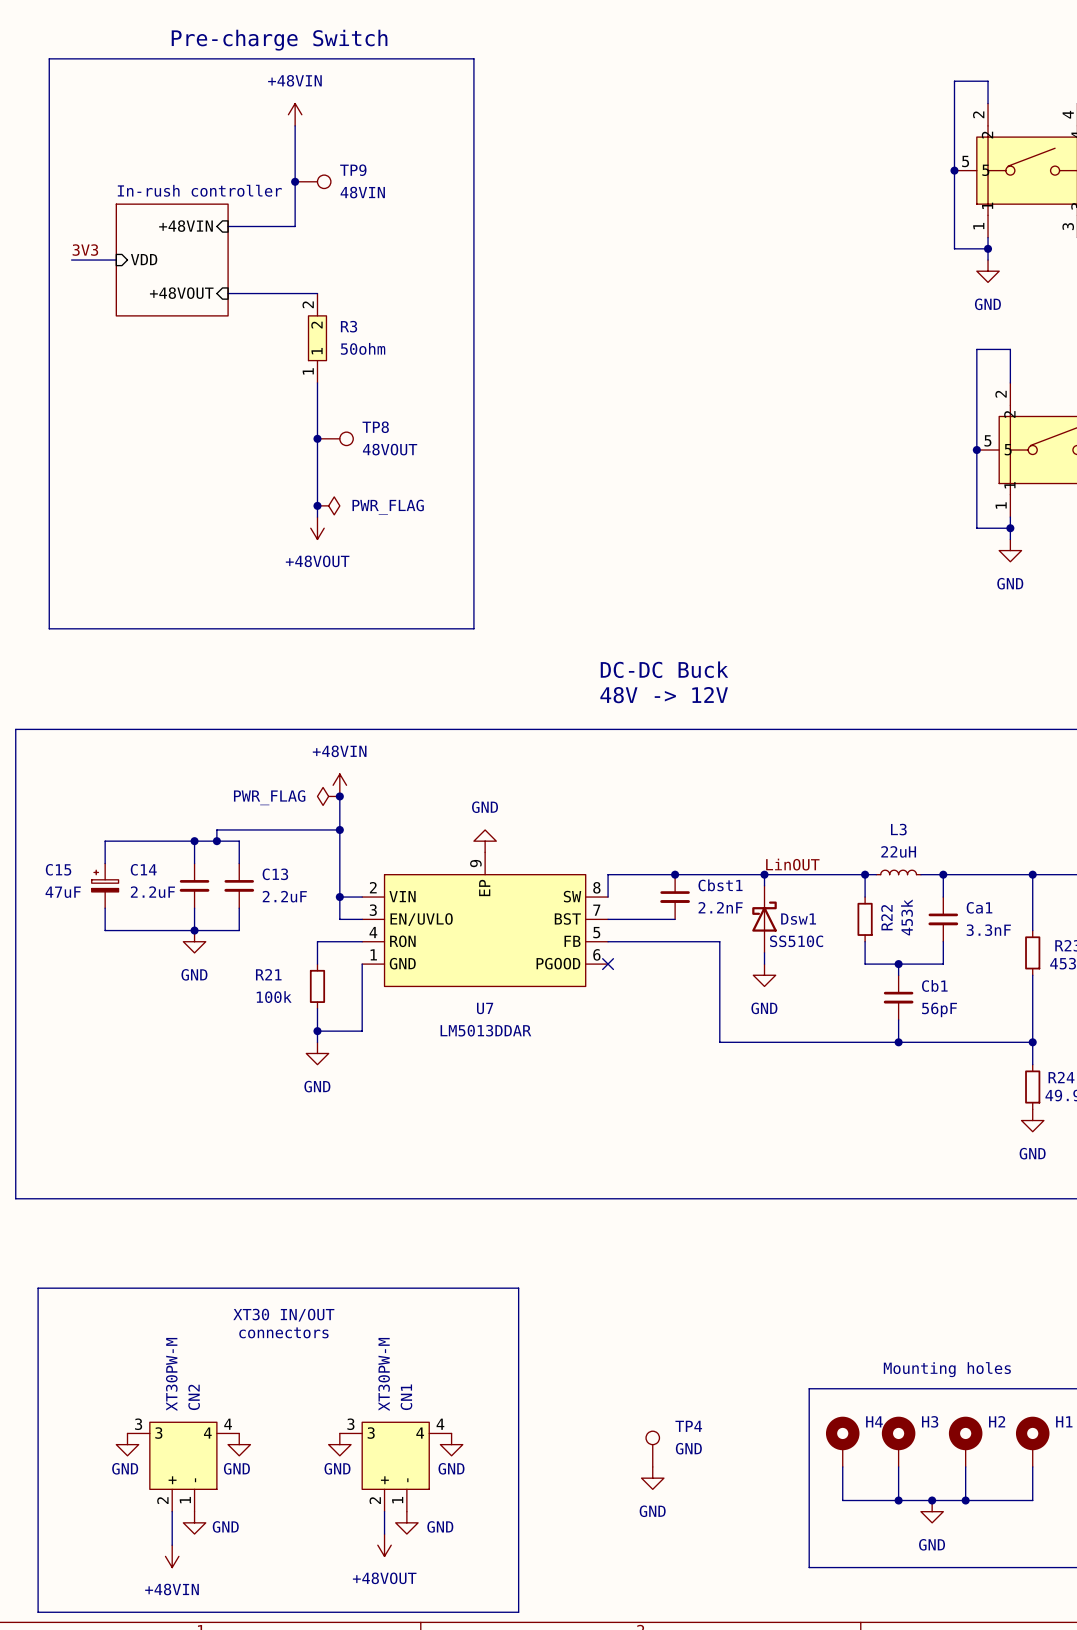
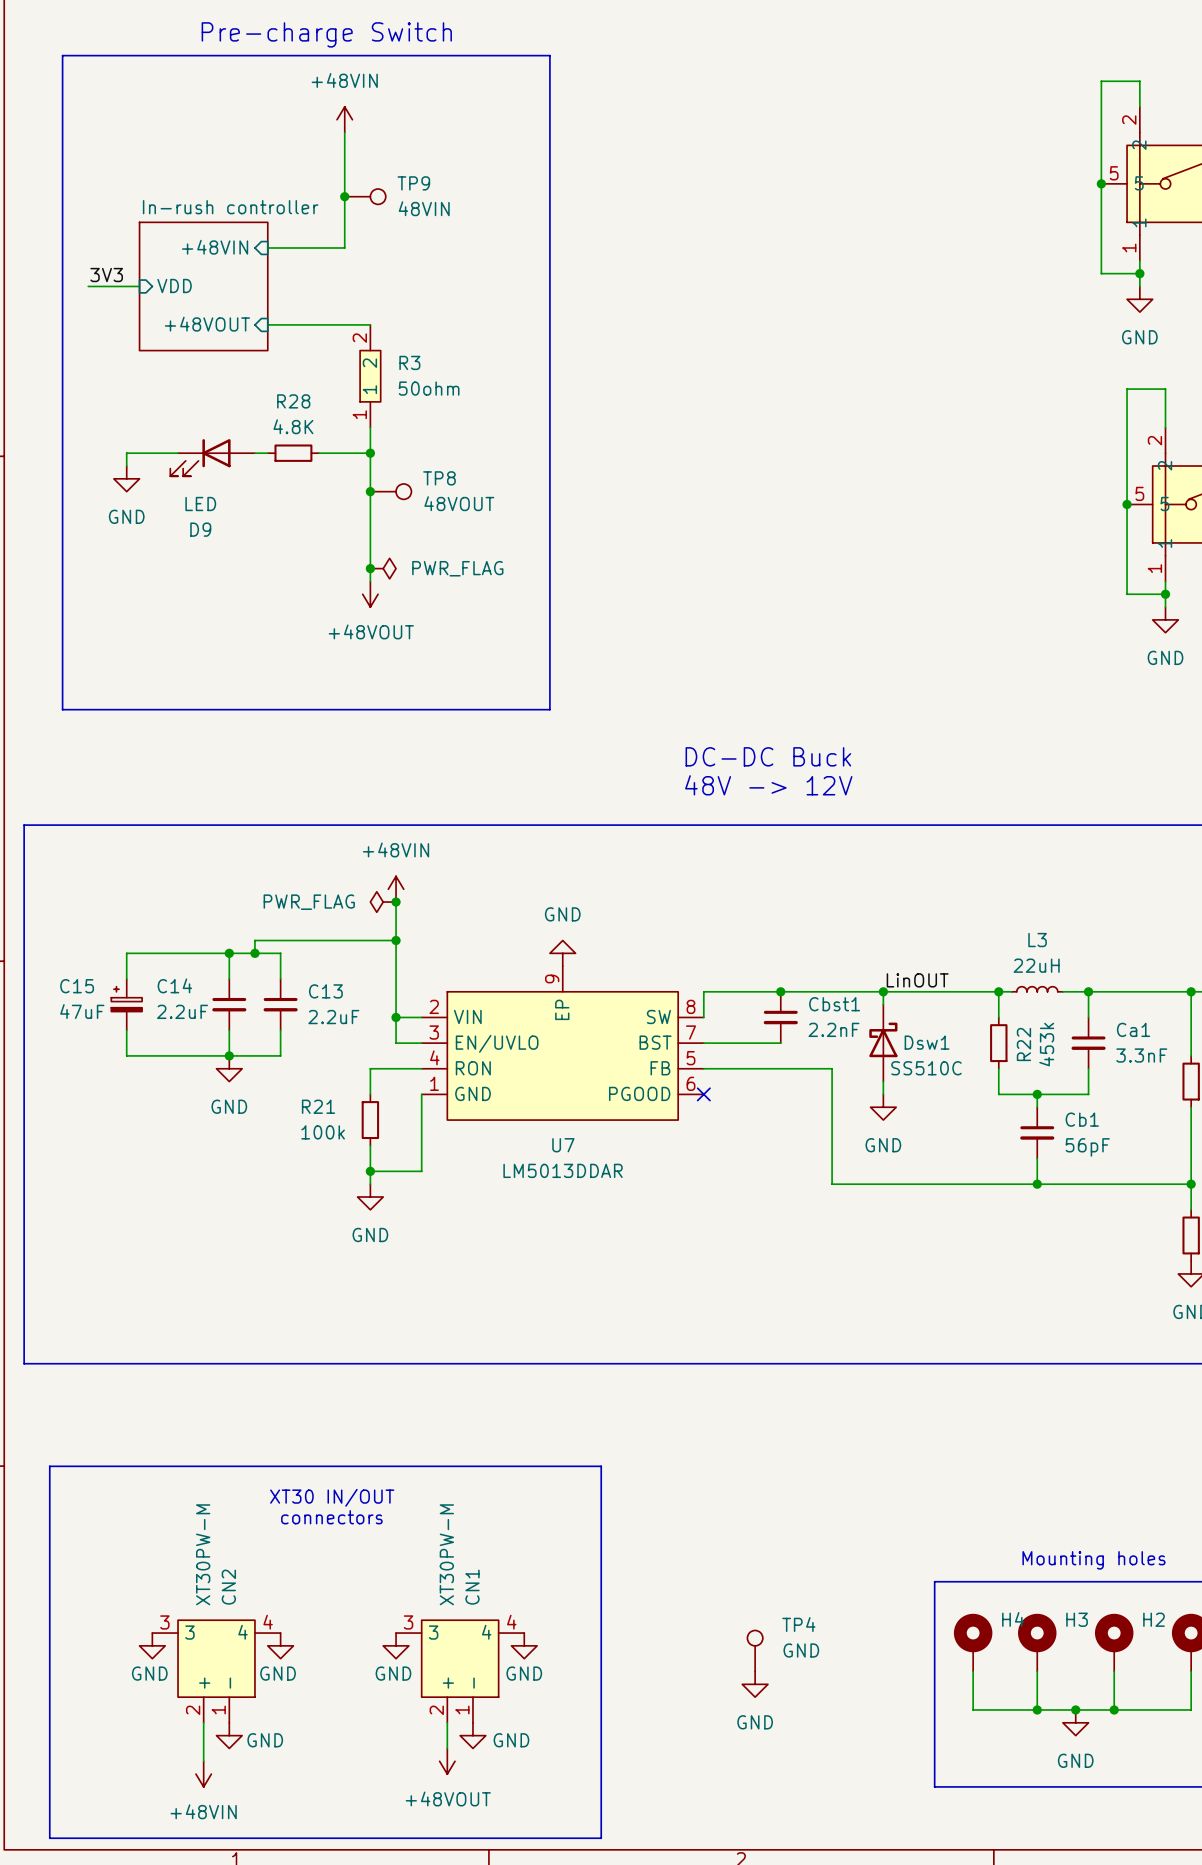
wire: none -> (178, 453) (126, 453) (126, 466)
wire: none -> (254, 453) (267, 453)
R28: none -> 4.8K (293, 453)
wire: none -> (319, 453) (370, 453)
junction: none -> (370, 453)
D9: none -> LED (212, 457)
power symbol: none -> GND (126, 478)

